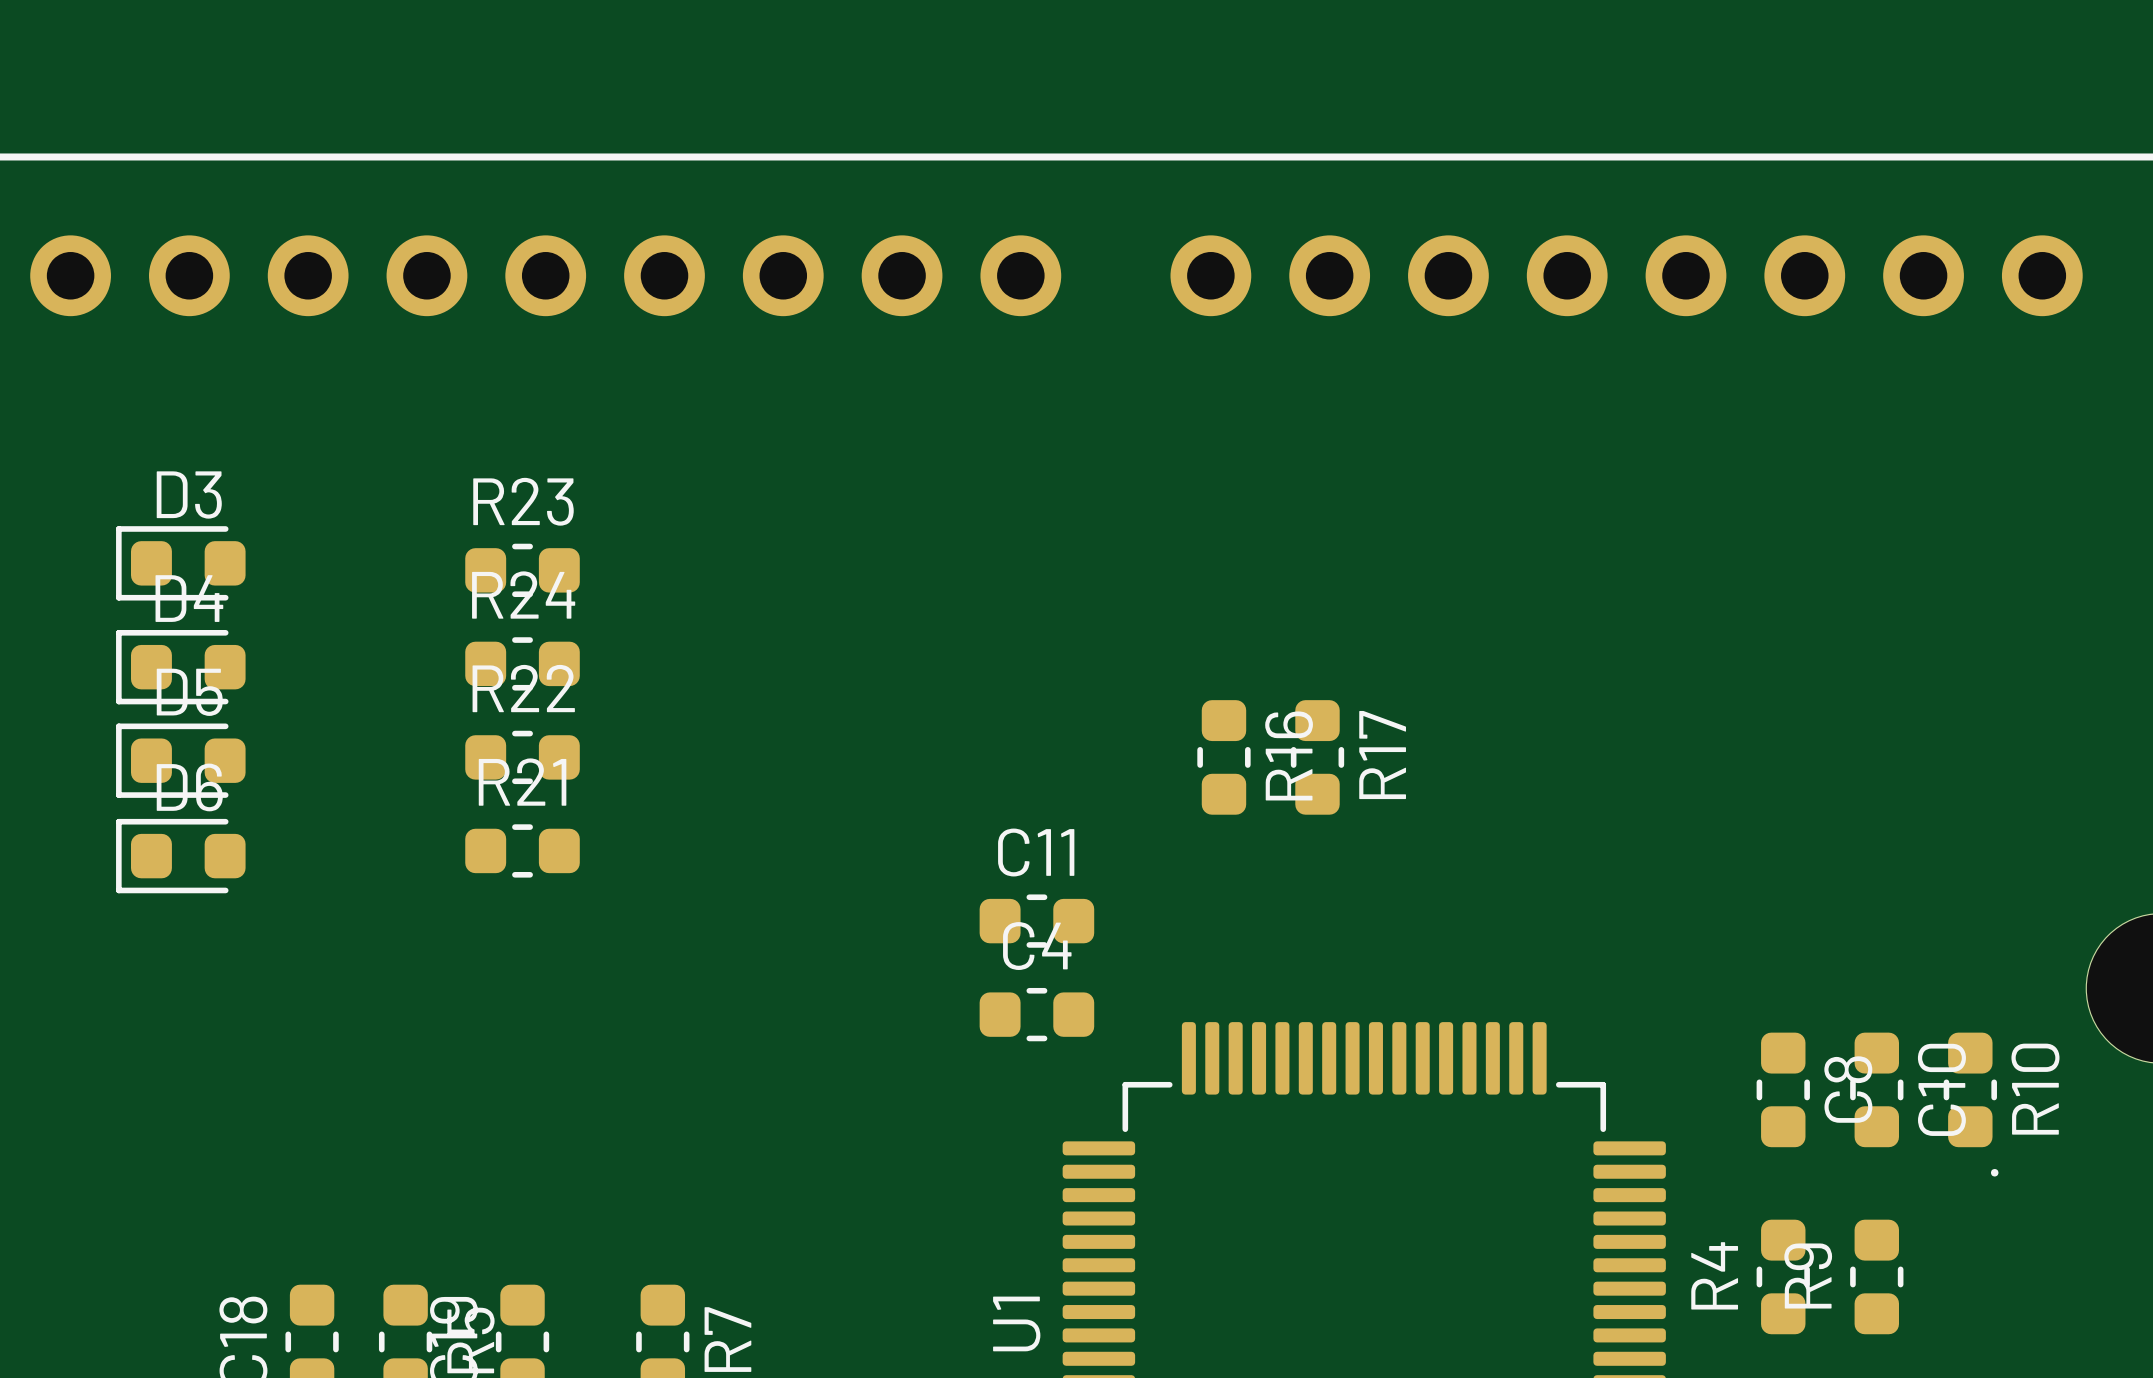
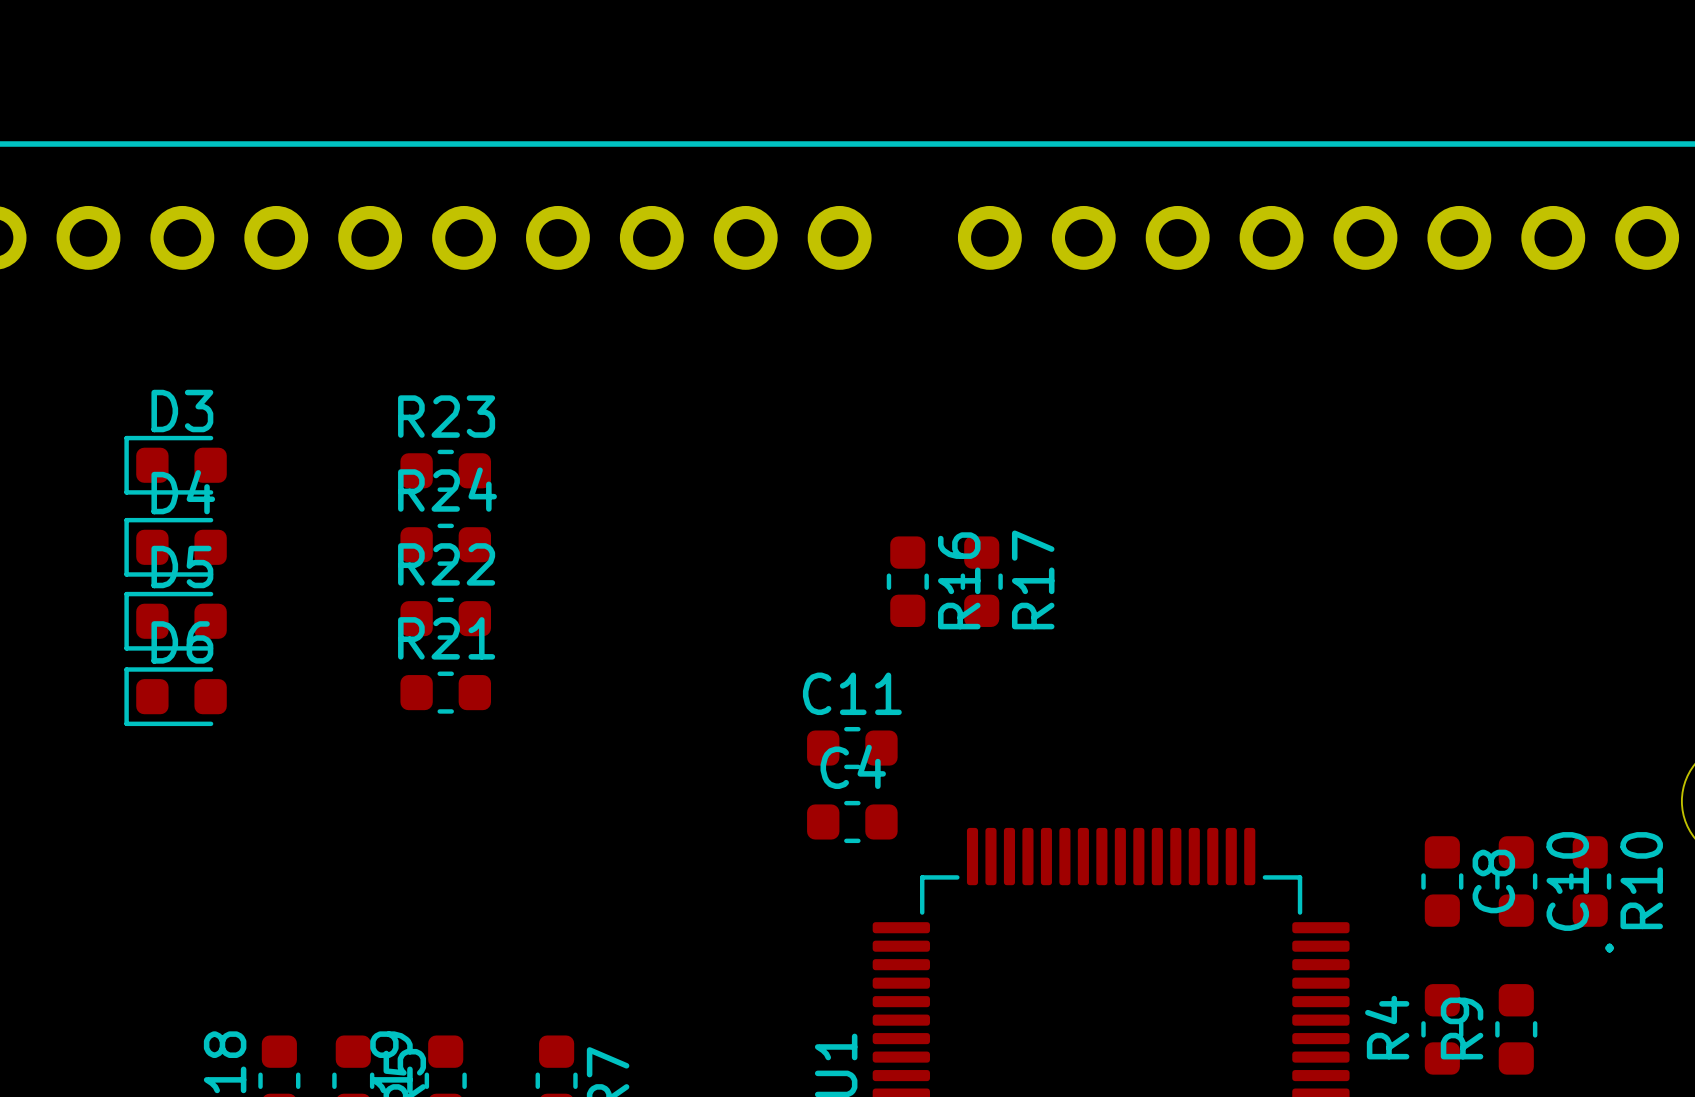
R16 position: (1223, 757) -> (907, 581)
R17 position: (1317, 757) -> (981, 581)

